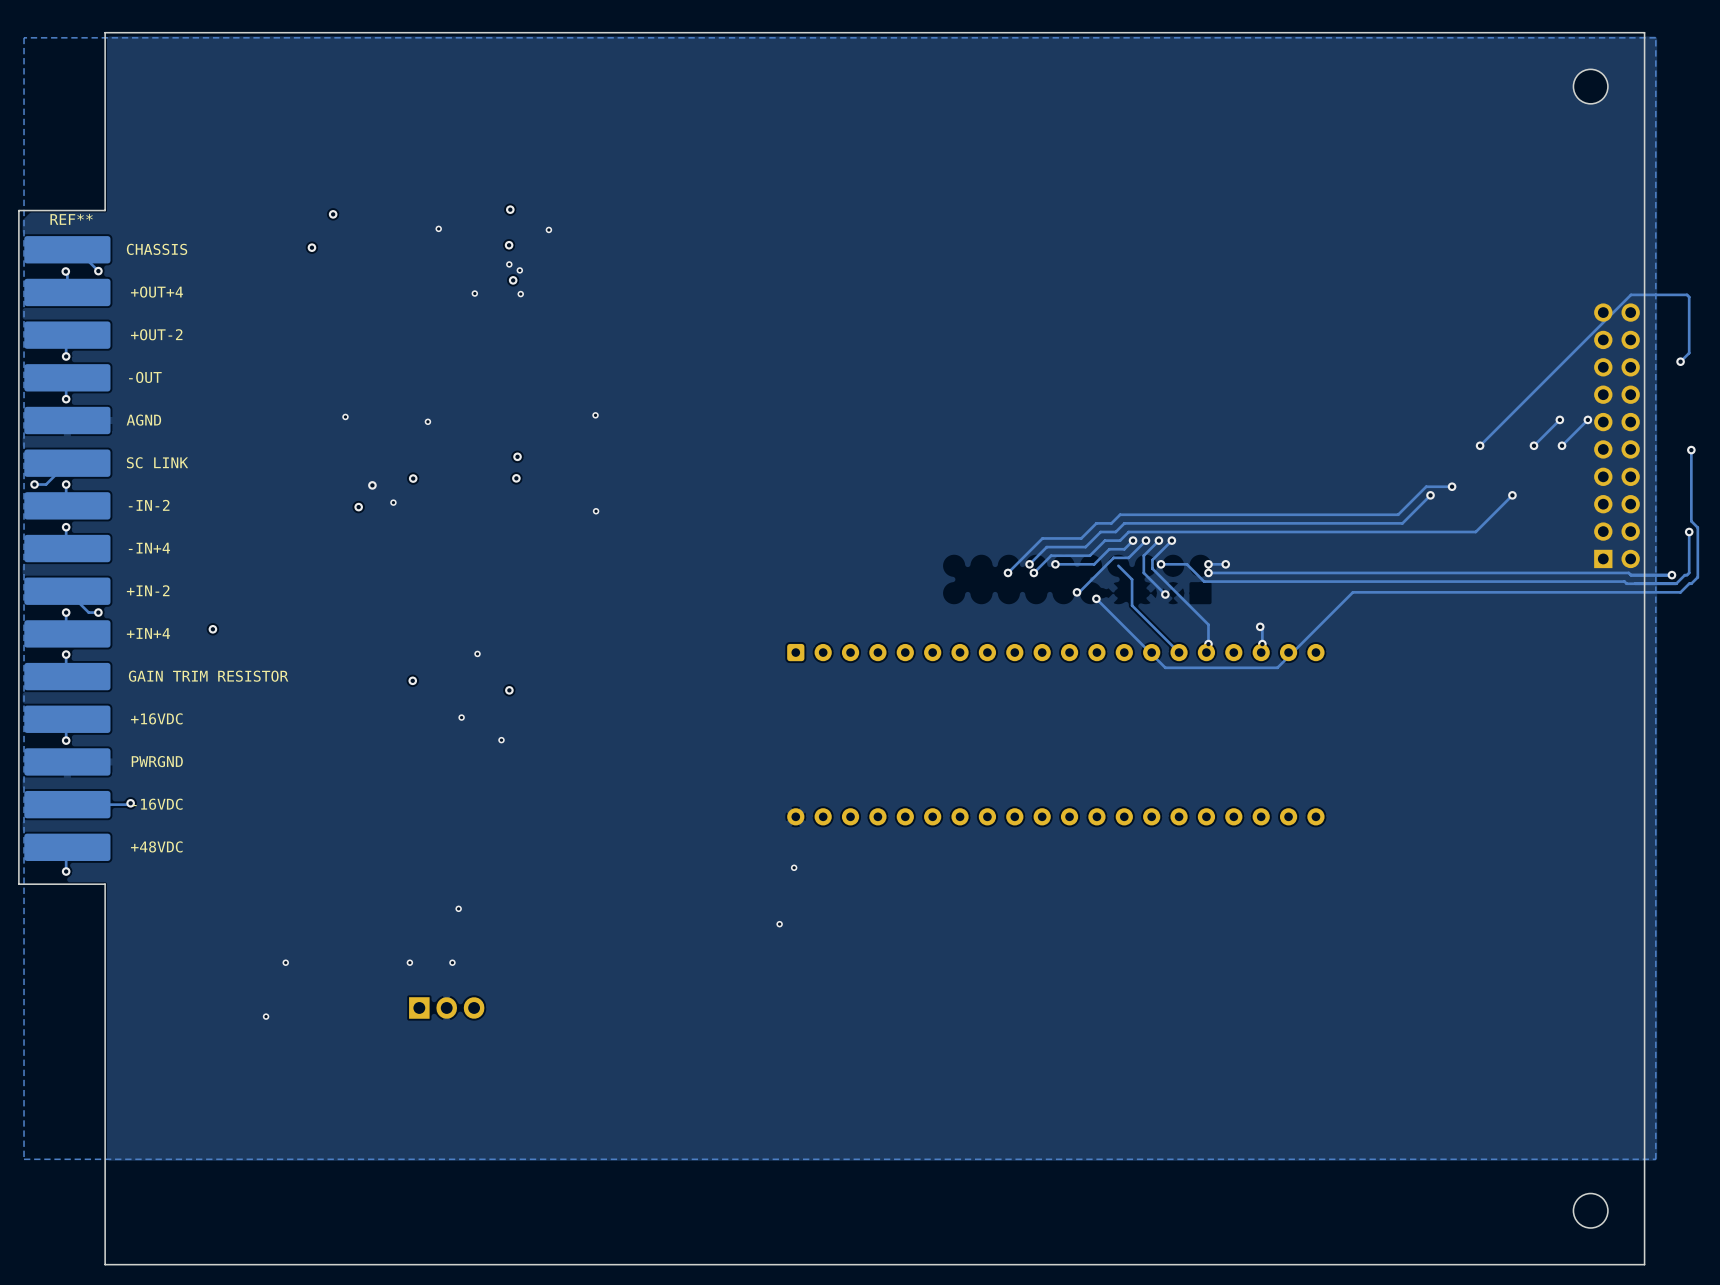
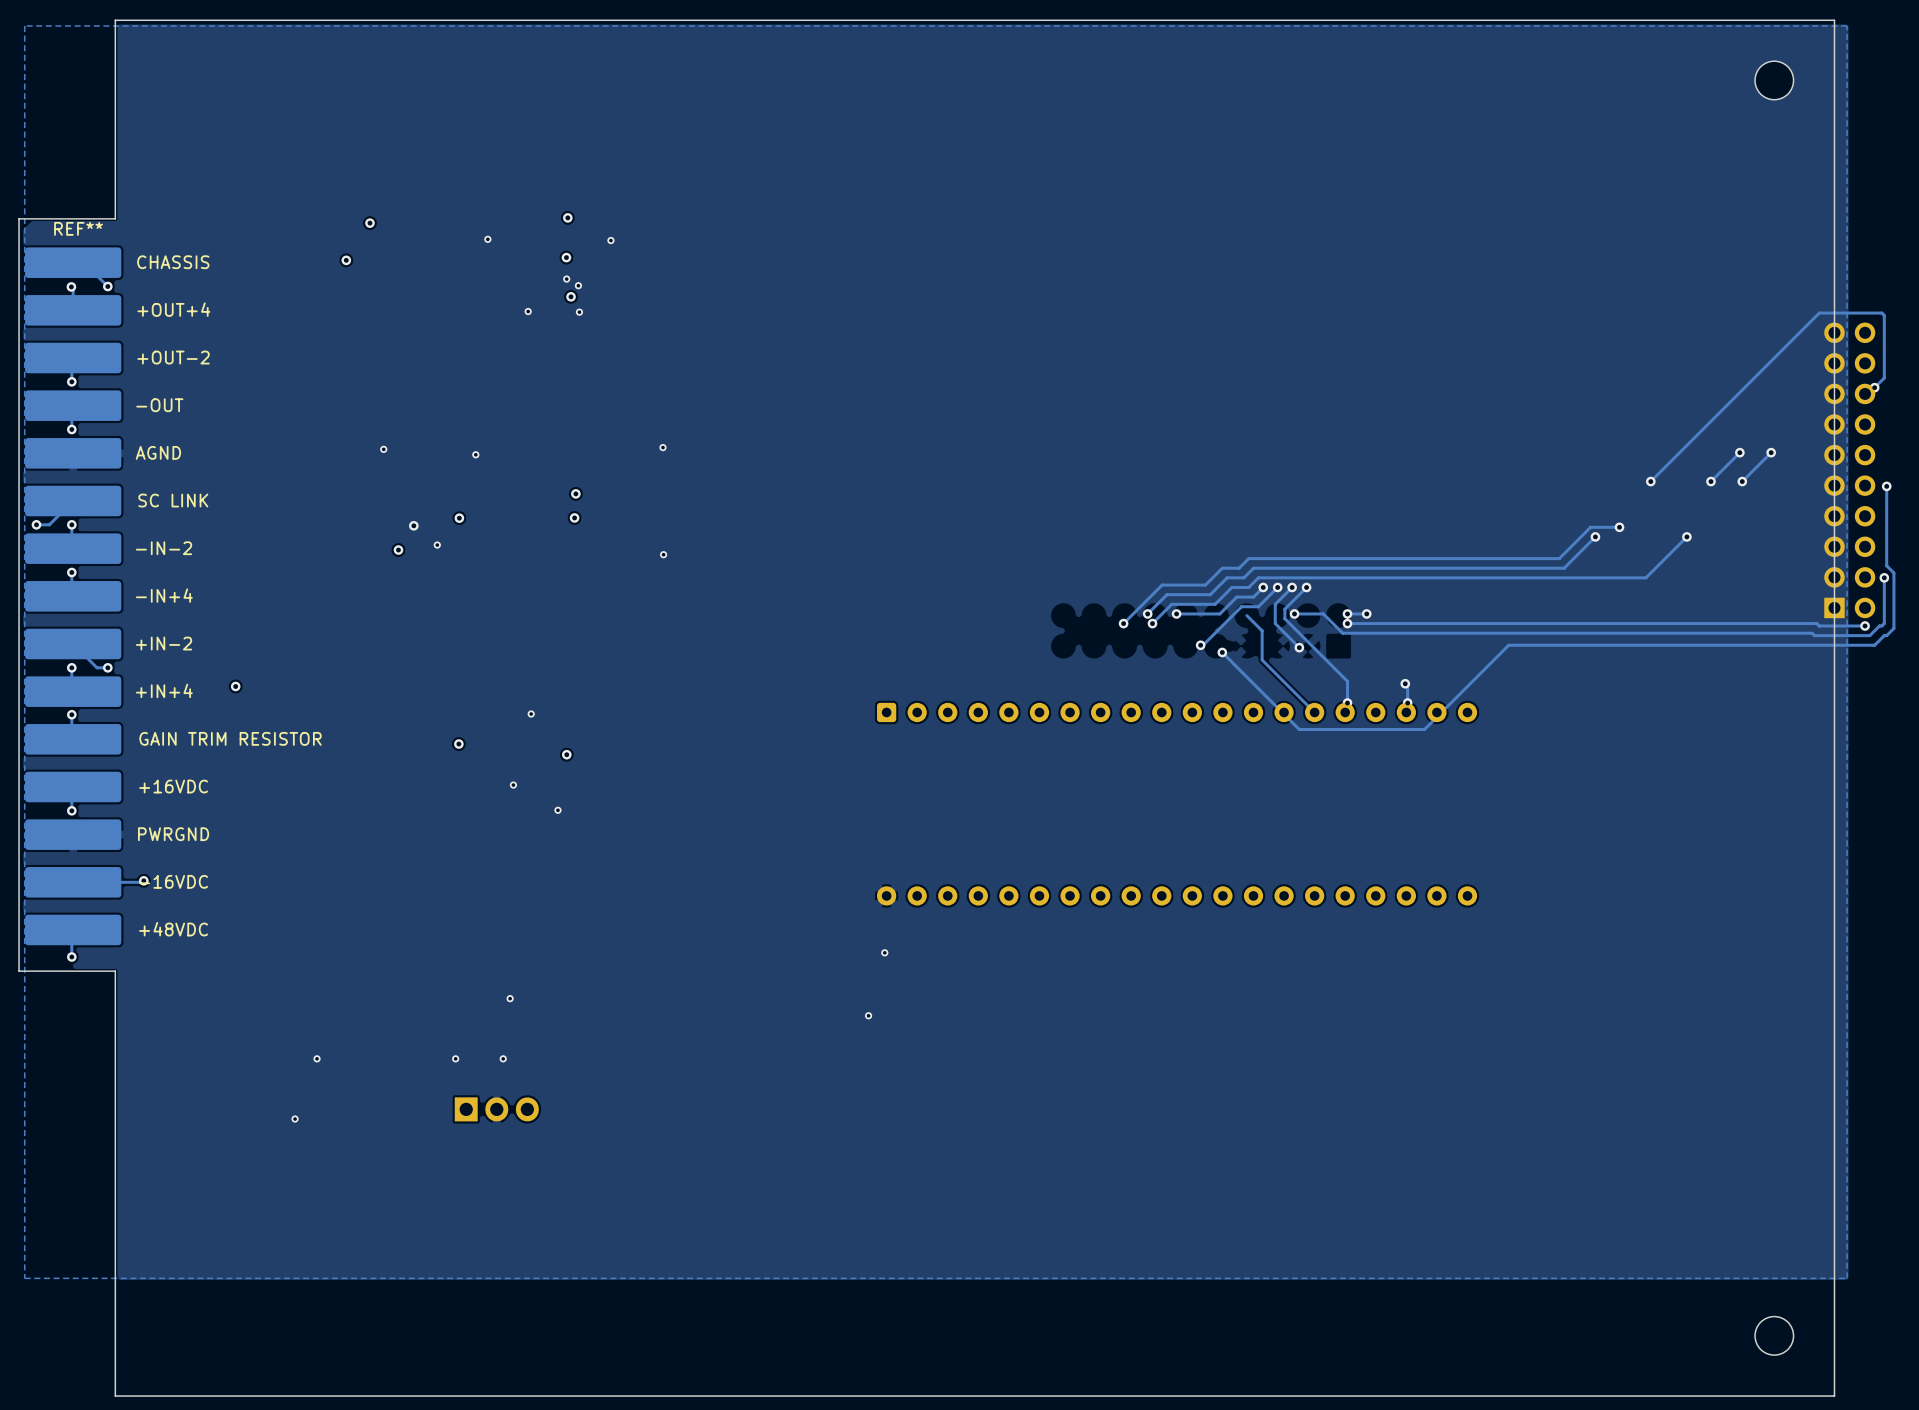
part position: (1616, 435) -> (1849, 470)

